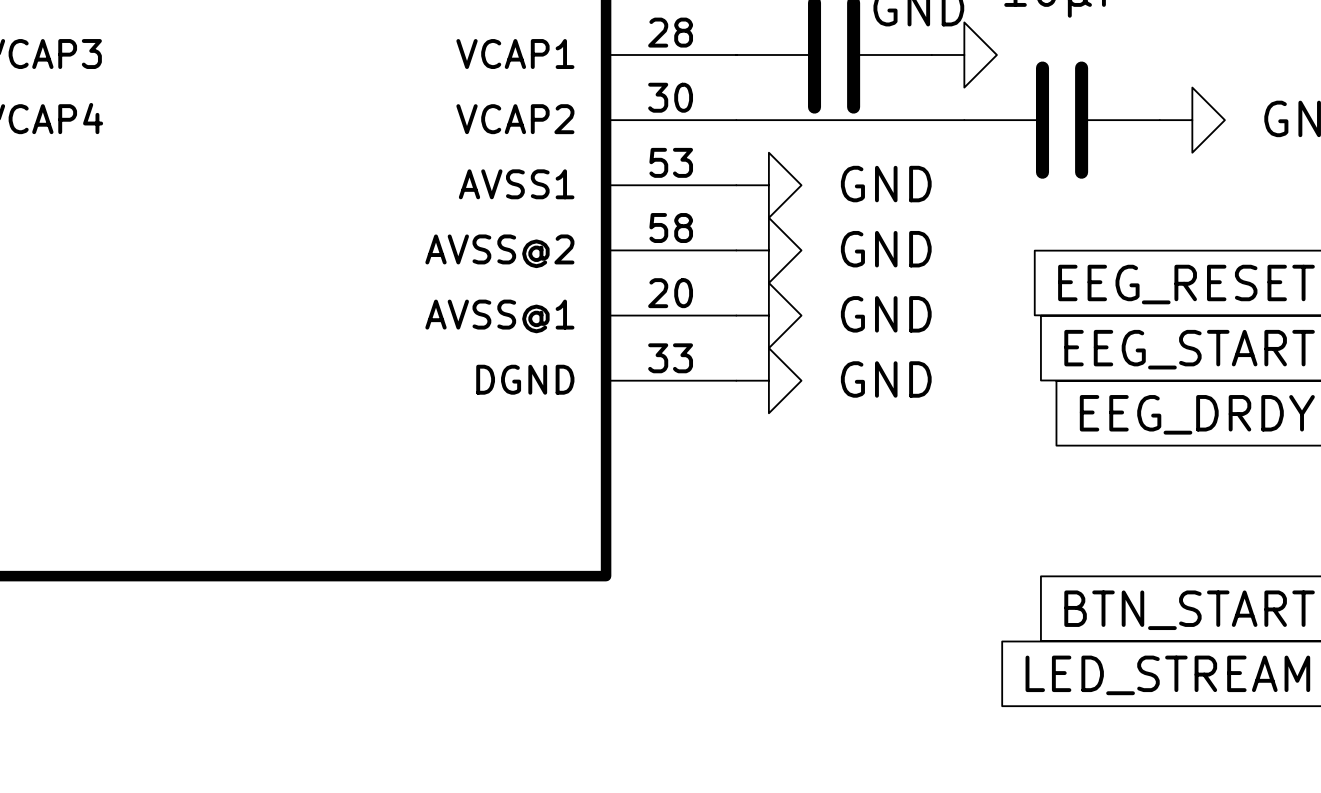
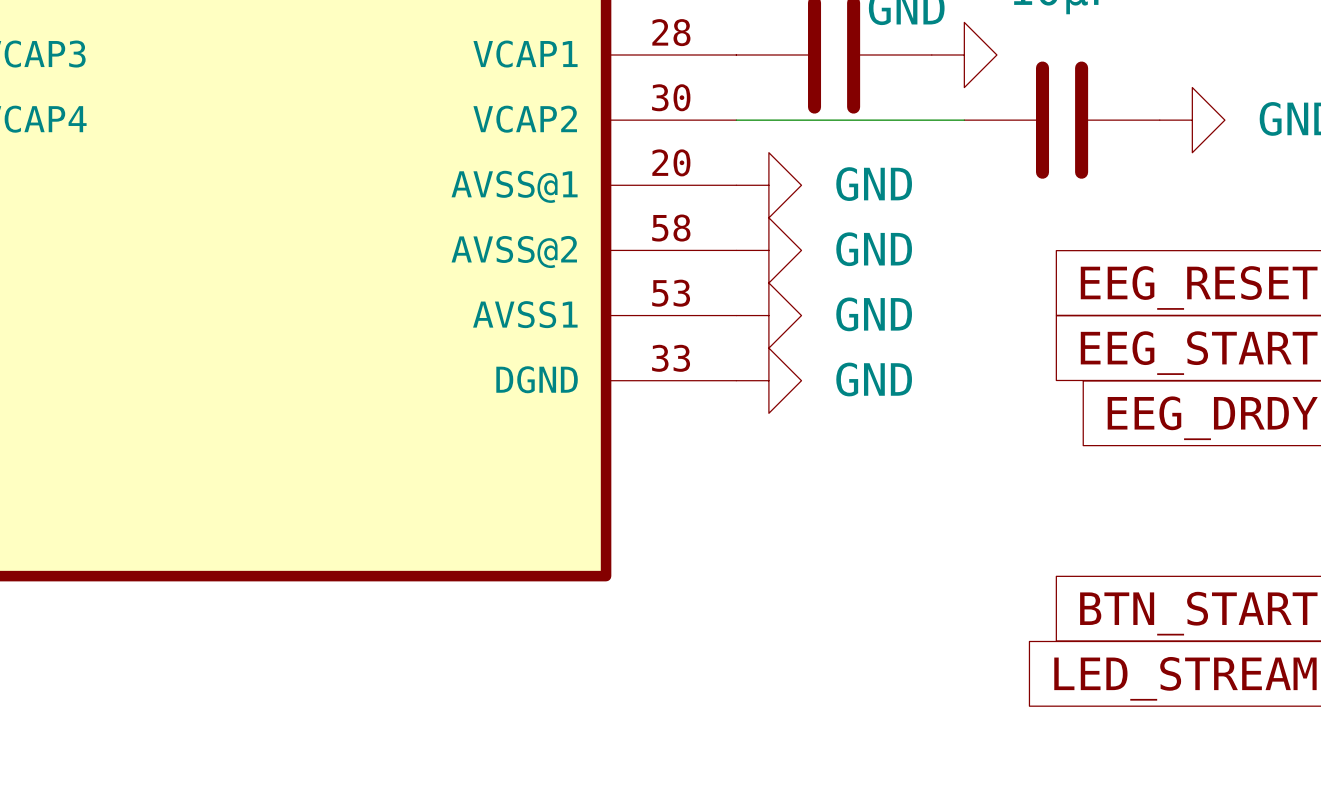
part pin number: 53 (671, 162) -> 20 (671, 162)
part pin name: AVSS1 (516, 184) -> AVSS@1 (514, 186)
part pin number: 20 (670, 293) -> 53 (671, 293)
part pin name: AVSS@1 (499, 316) -> AVSS1 (525, 314)

